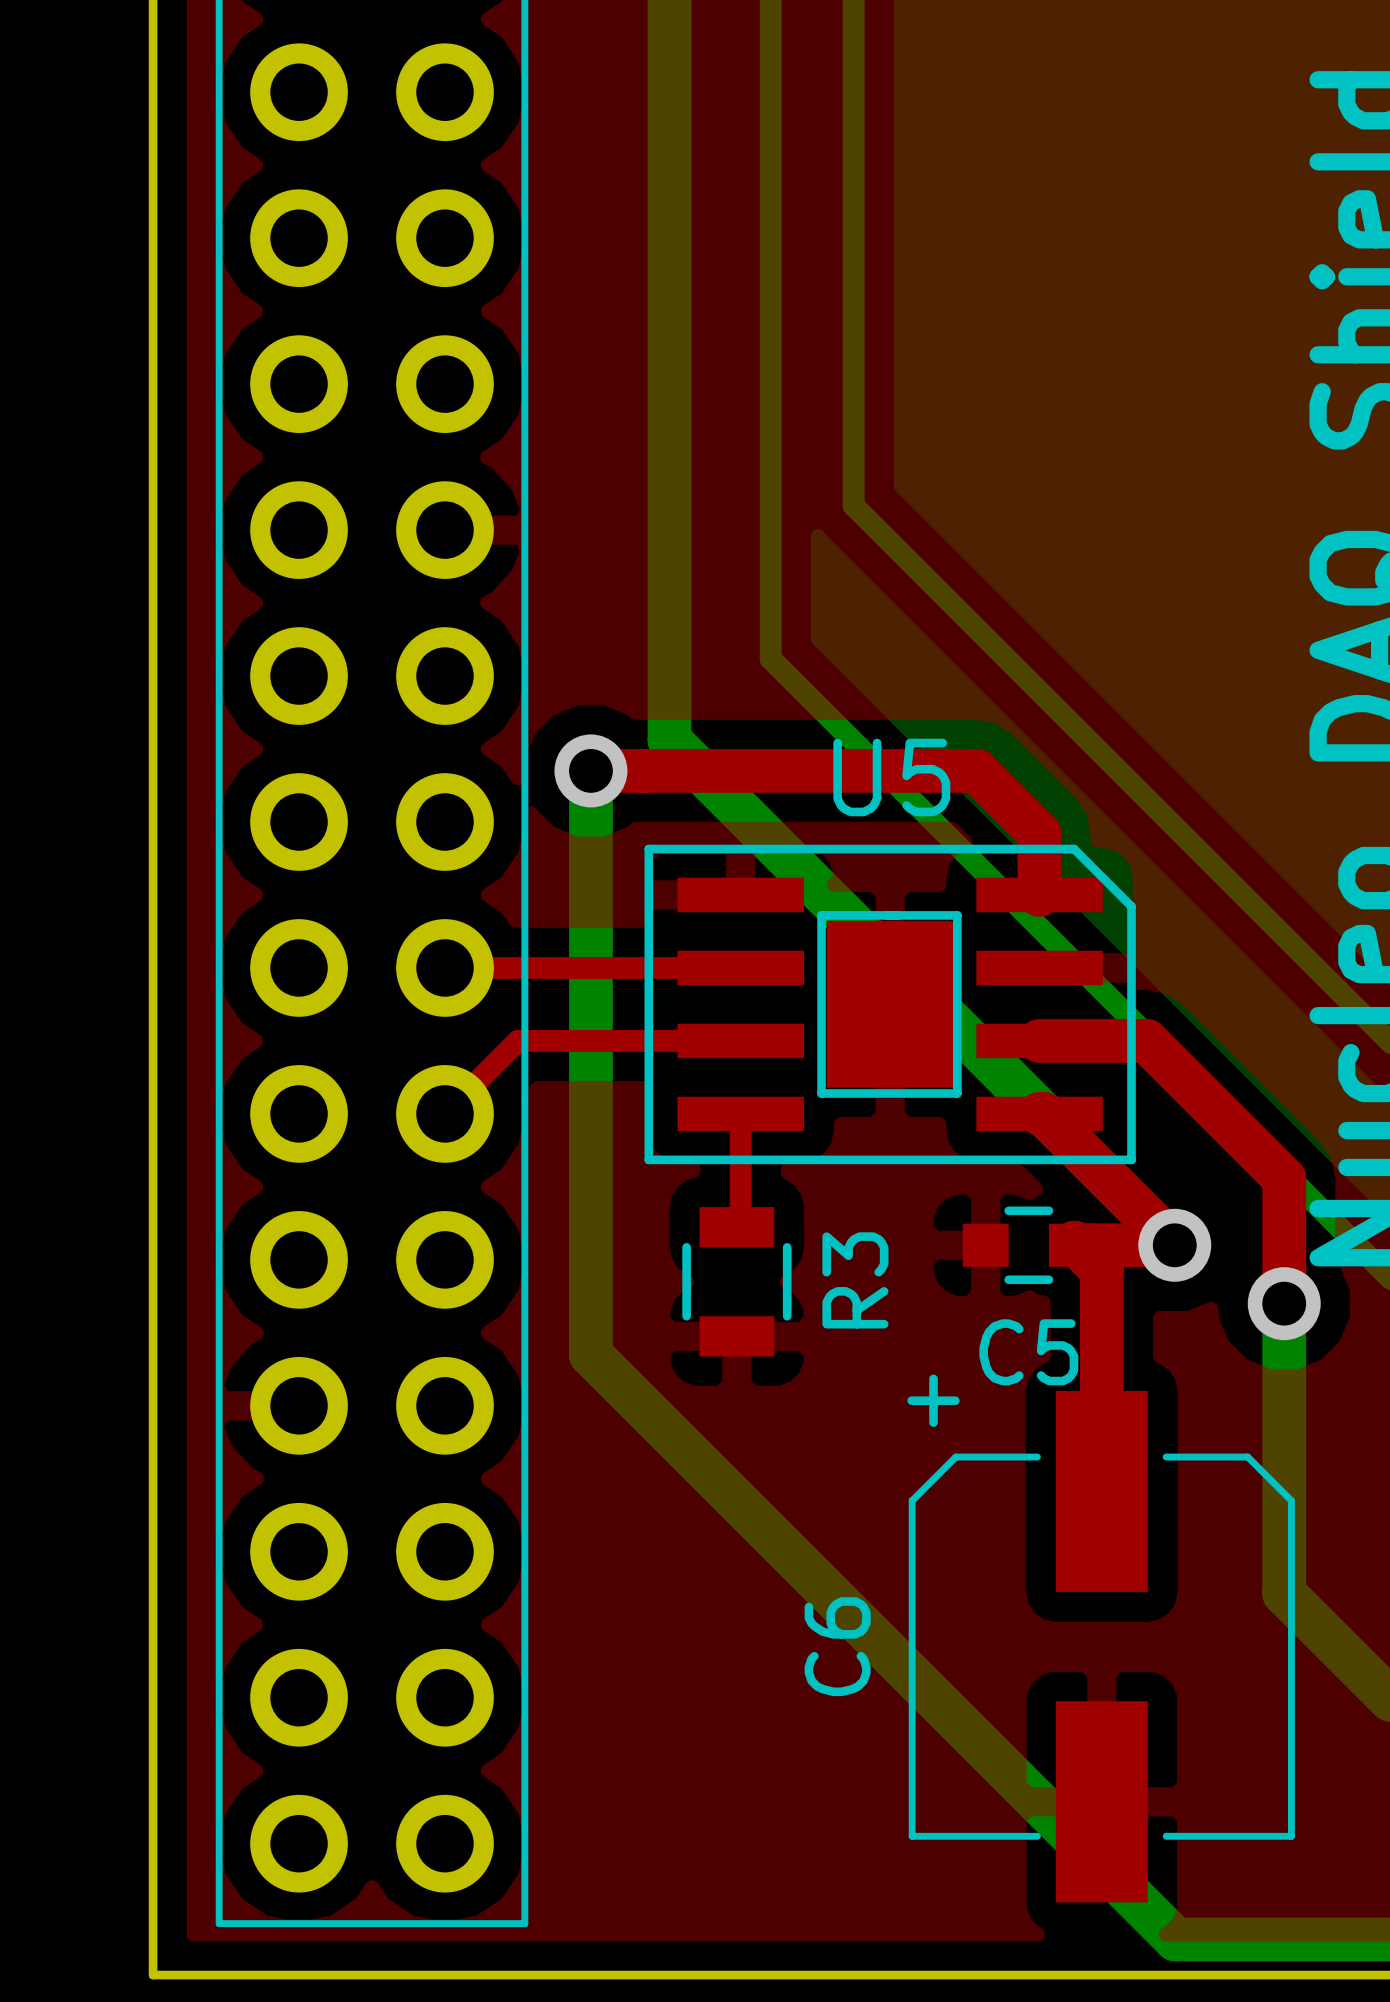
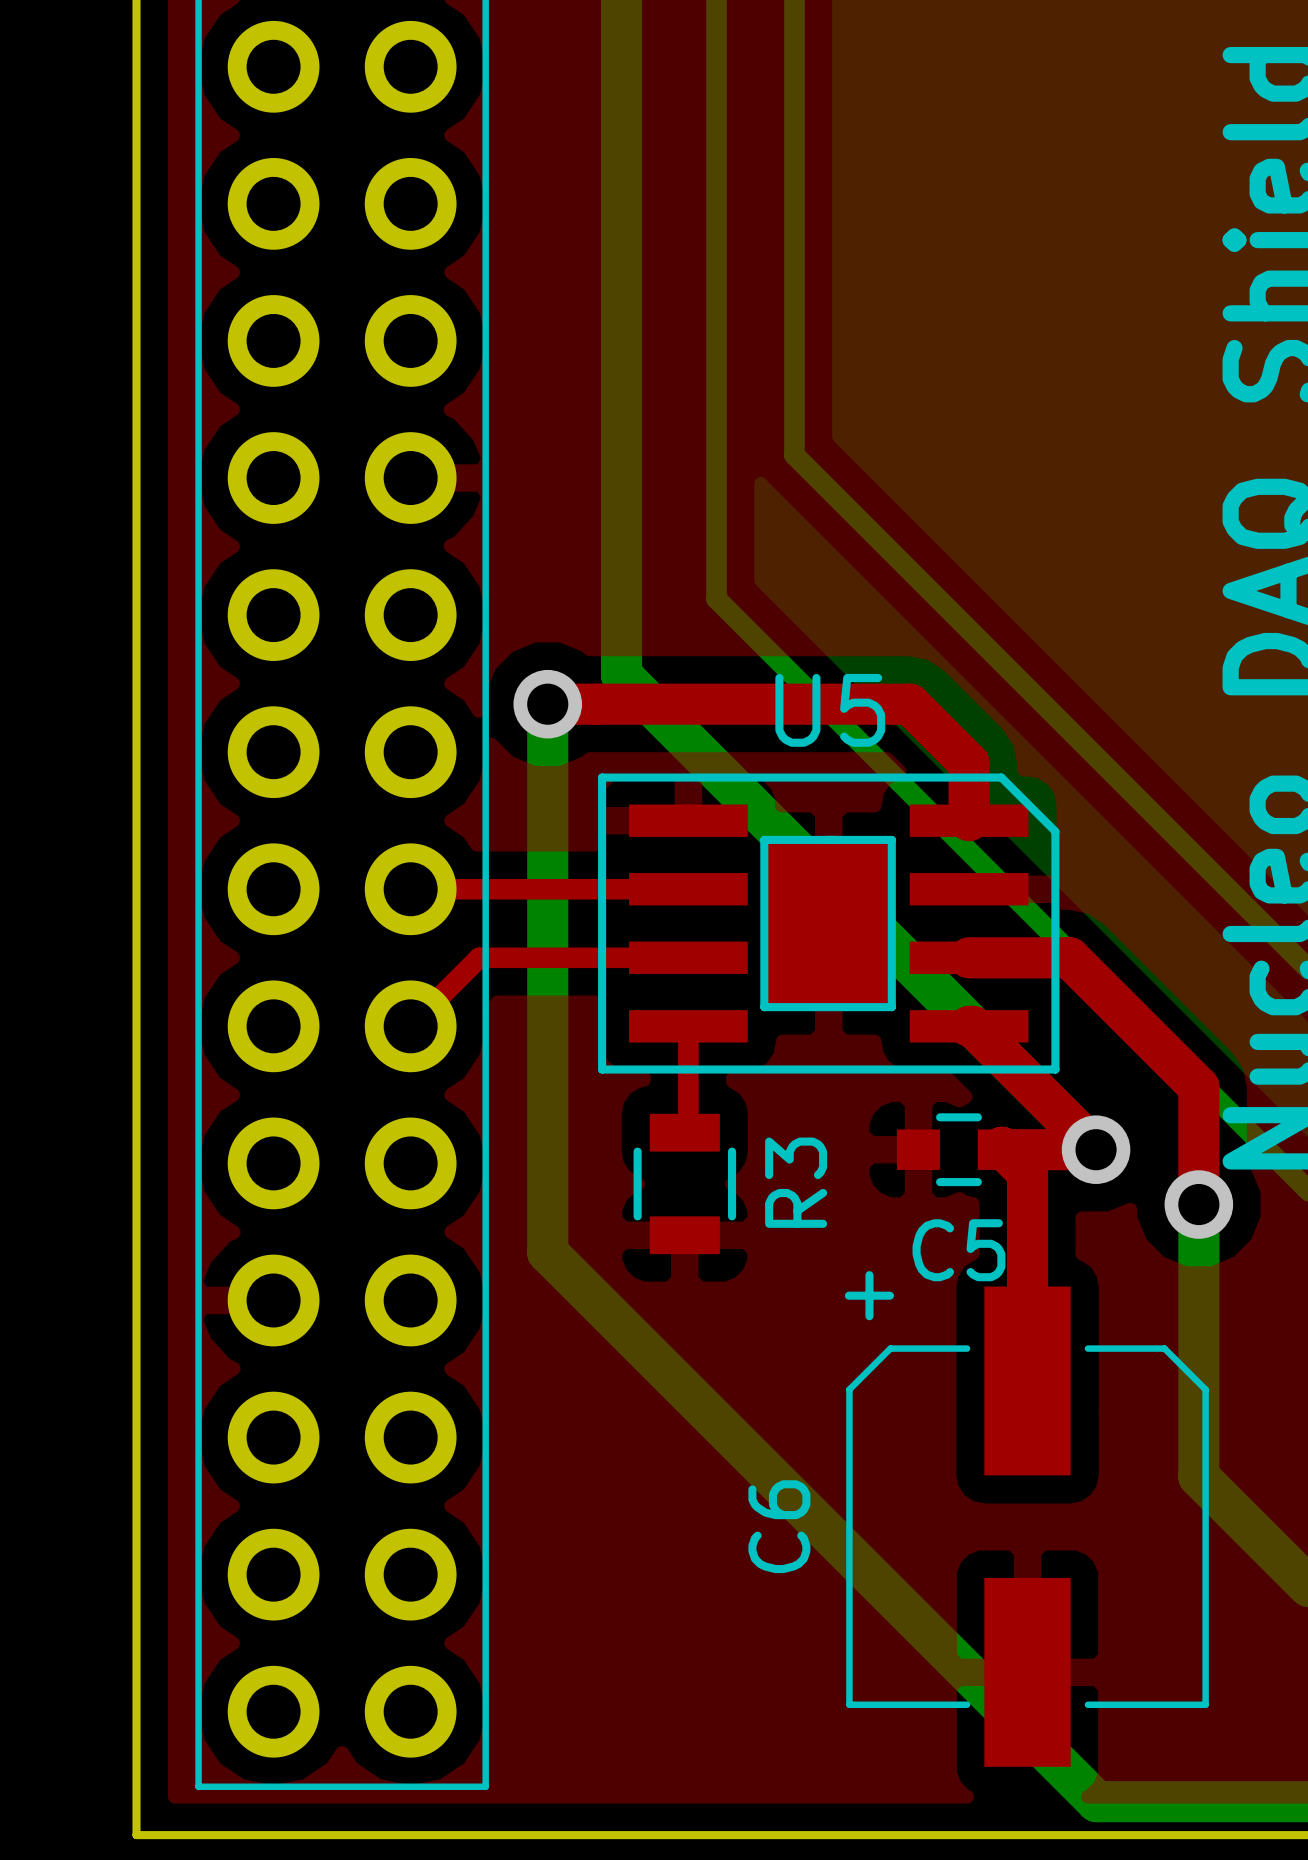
U5 footprint: [644, 844, 1136, 1165] -> [598, 773, 1060, 1074]

